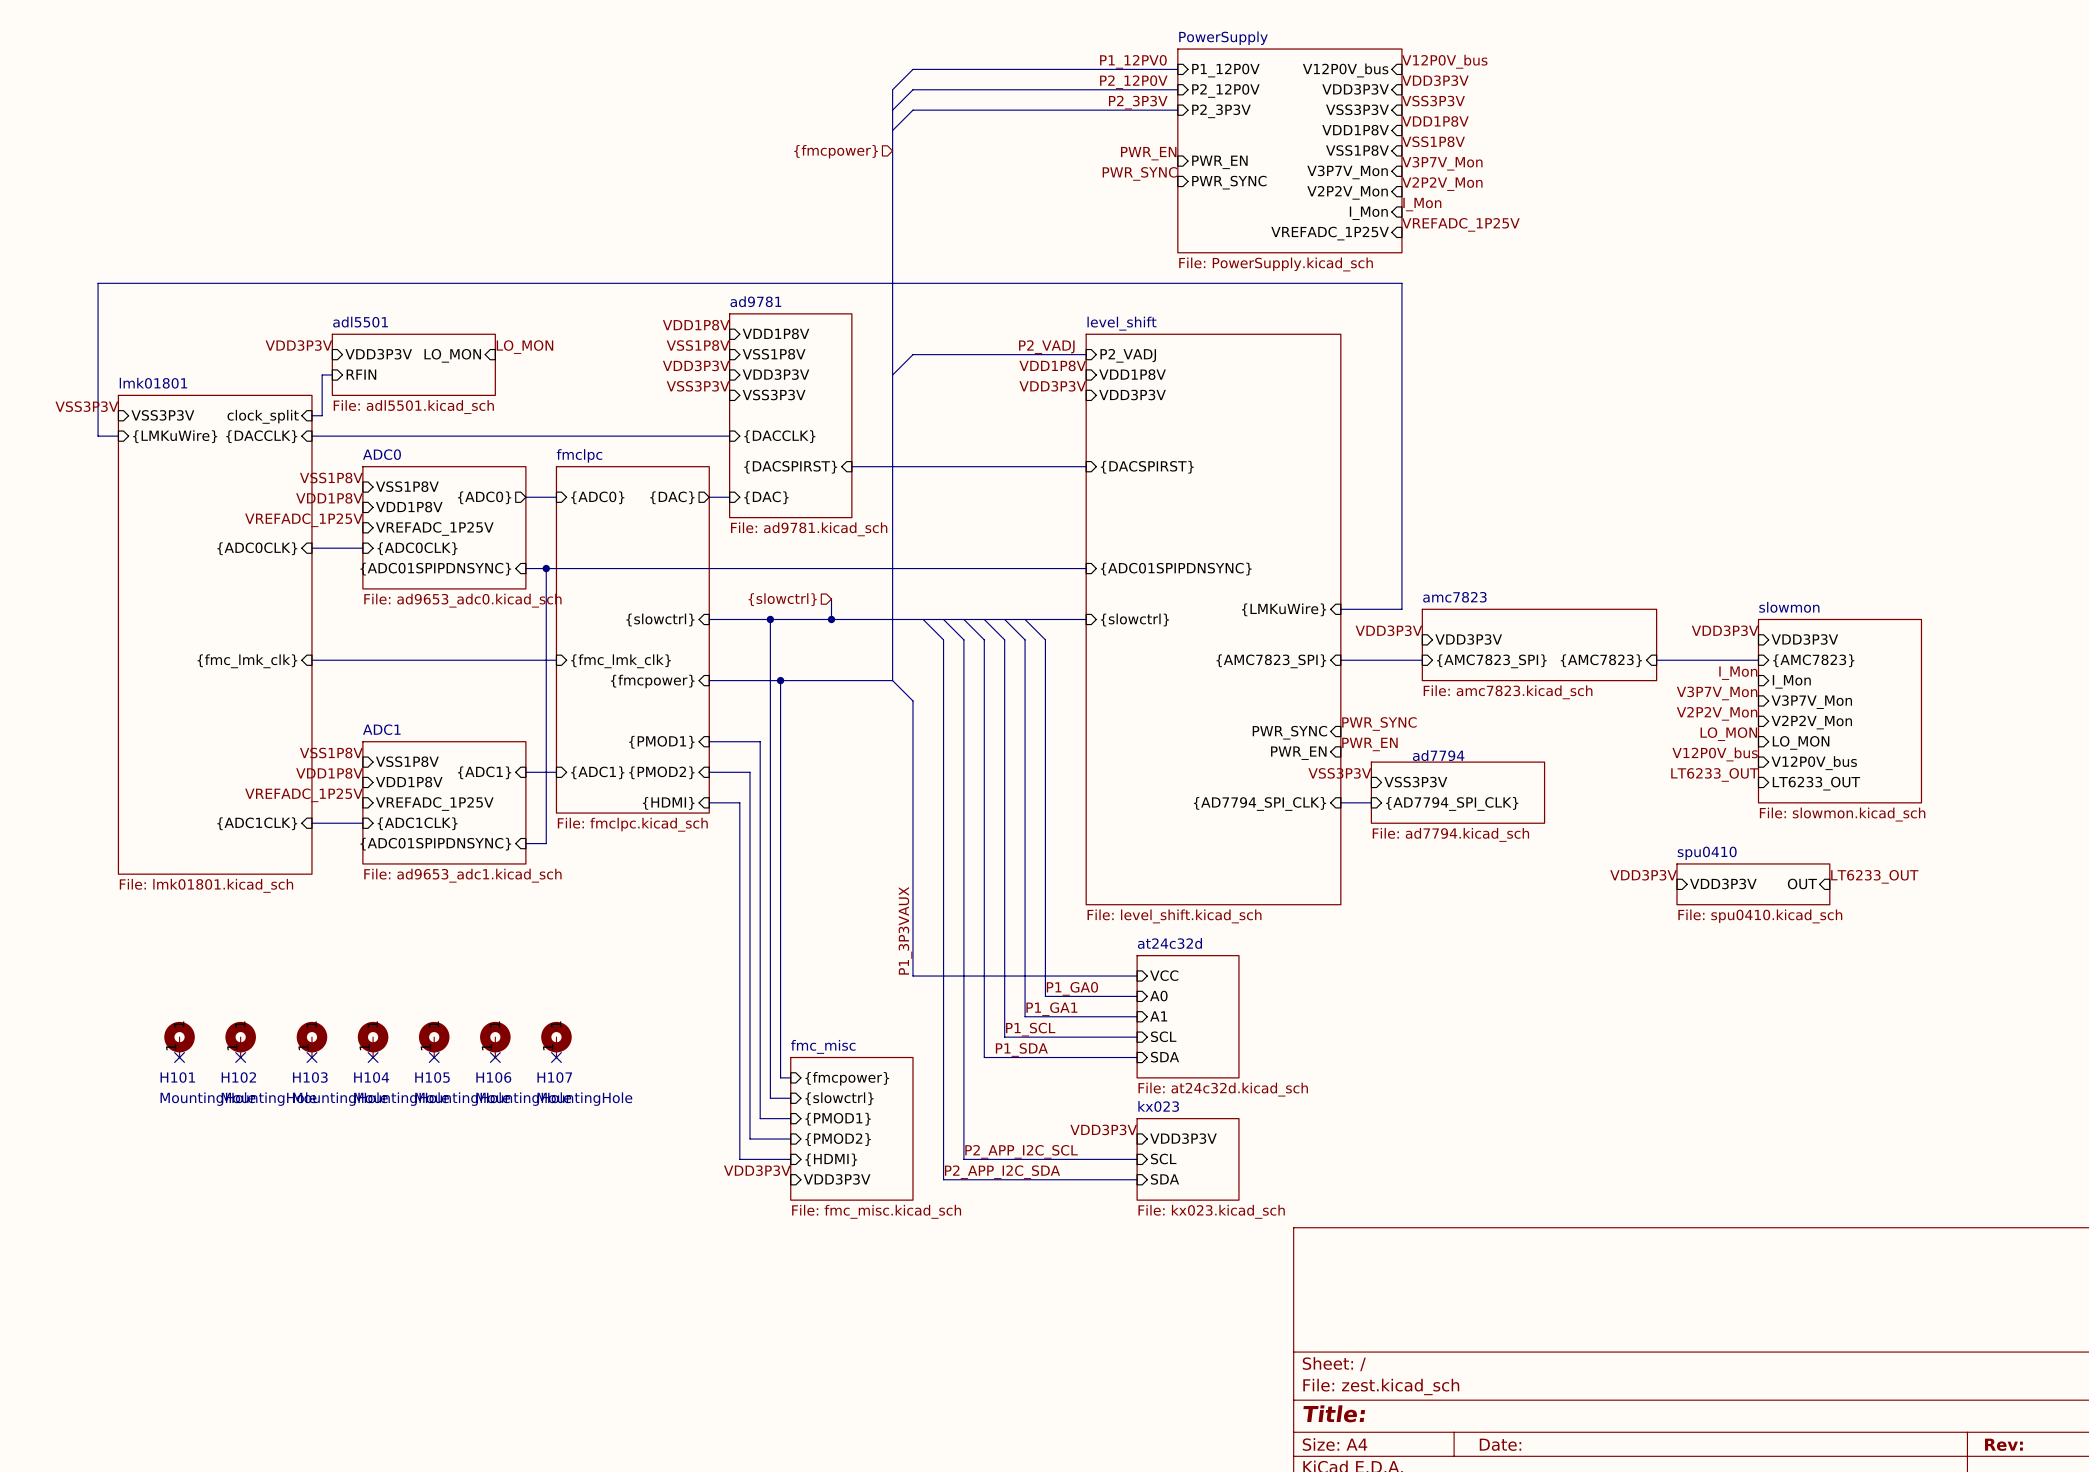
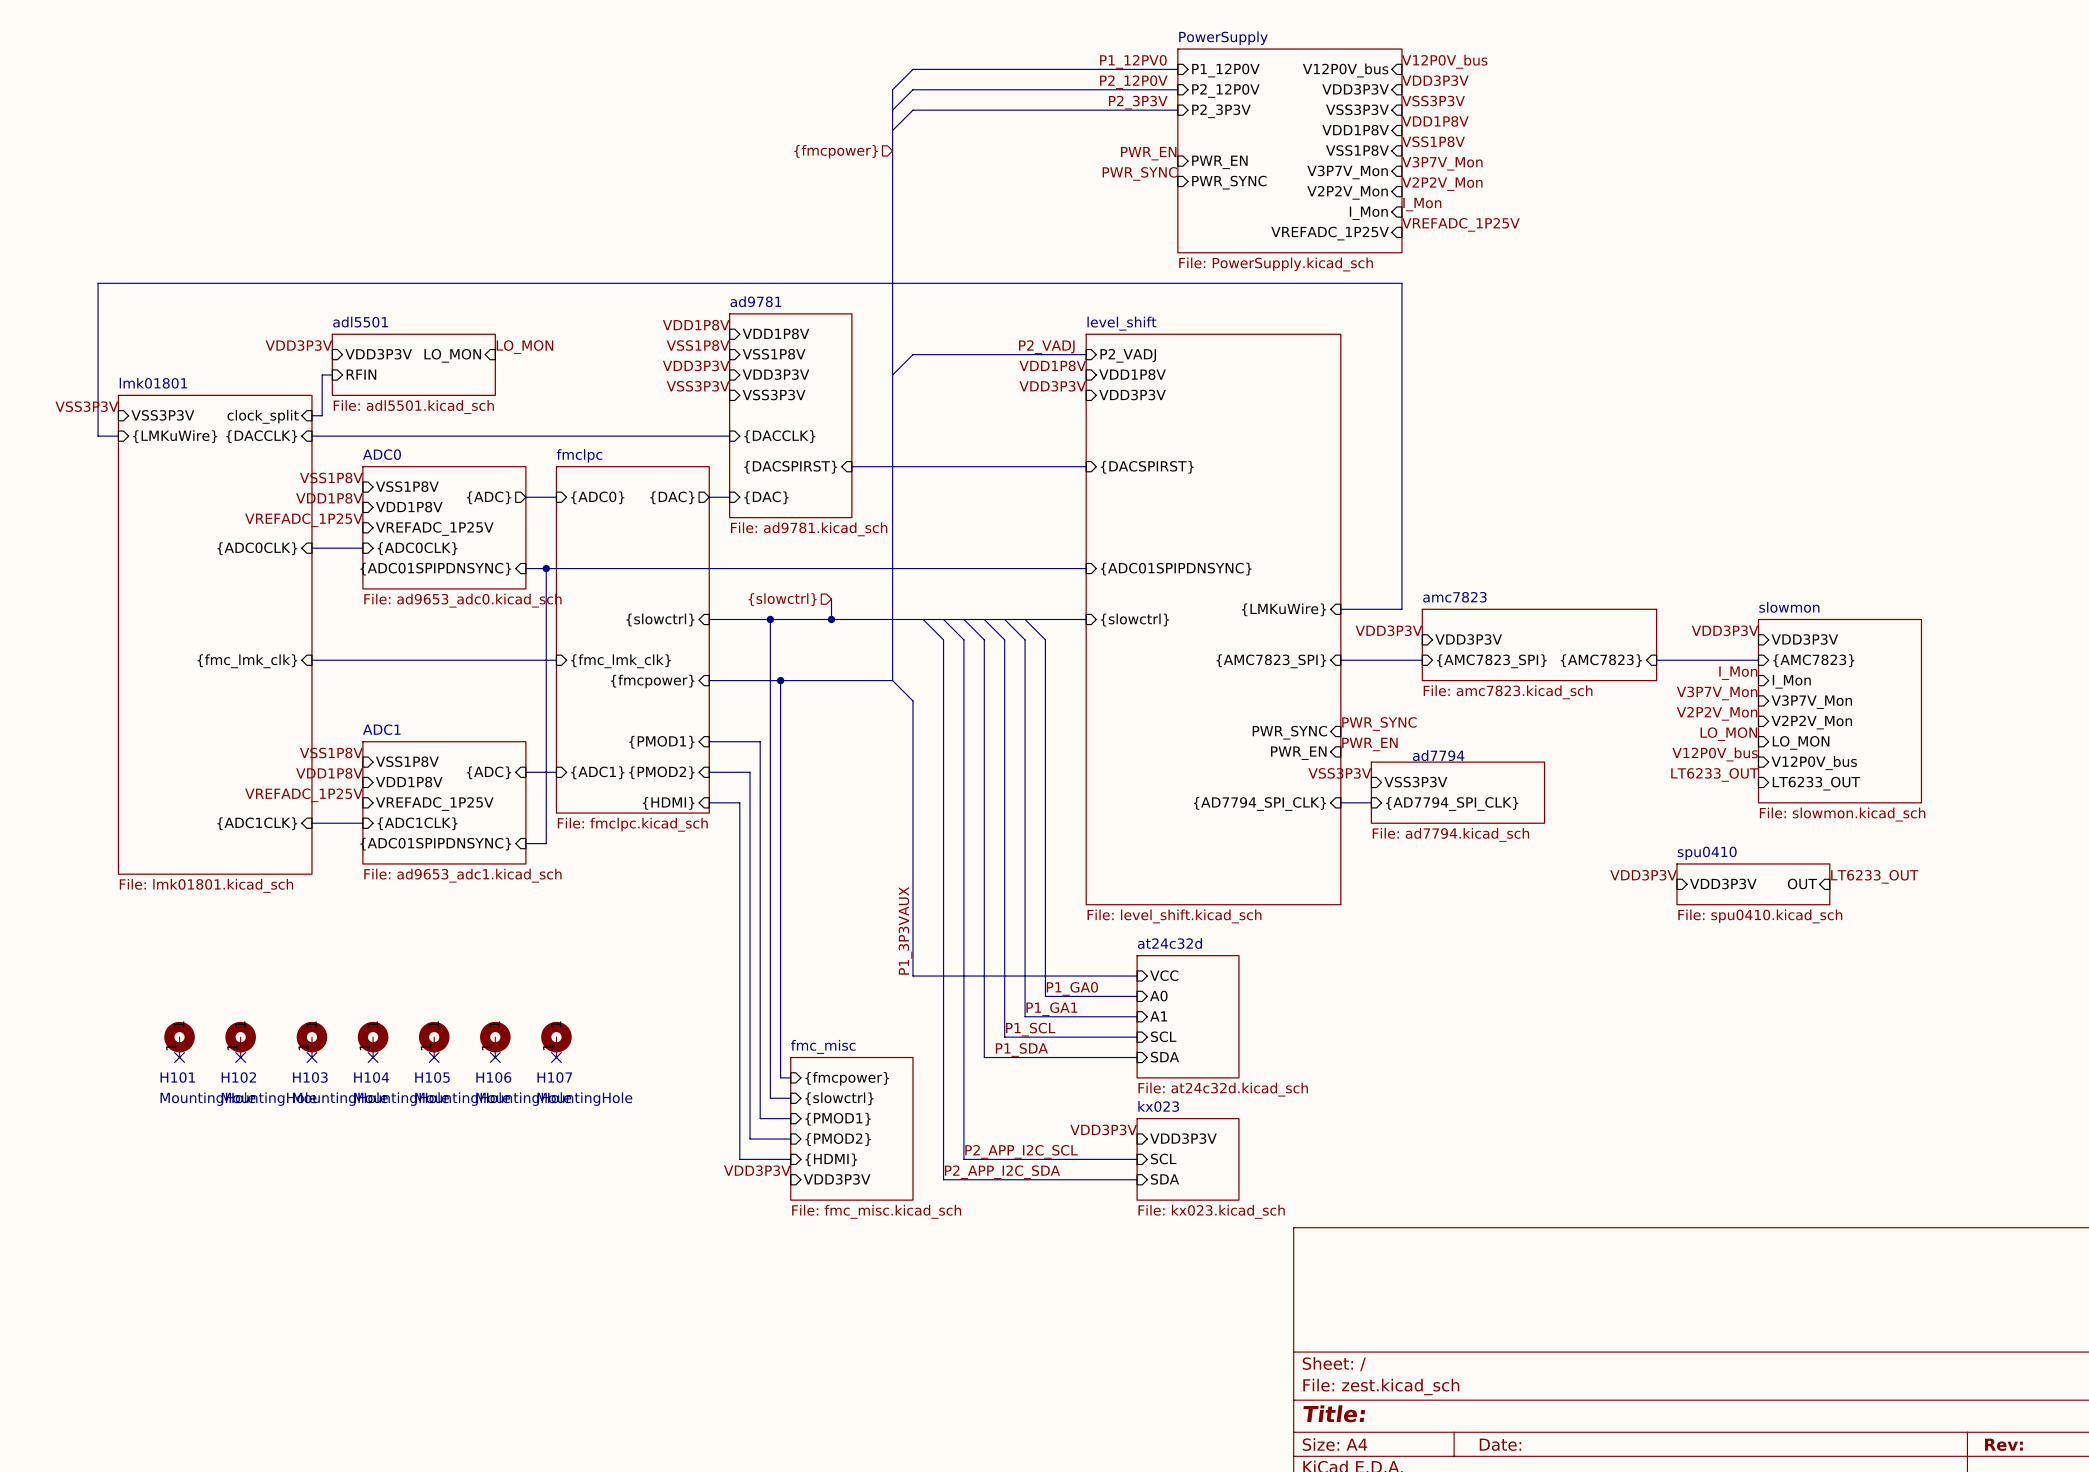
sheet pin: {ADC0} (484, 497) -> {ADC} (489, 497)
sheet pin: {ADC1} (484, 772) -> {ADC} (489, 772)

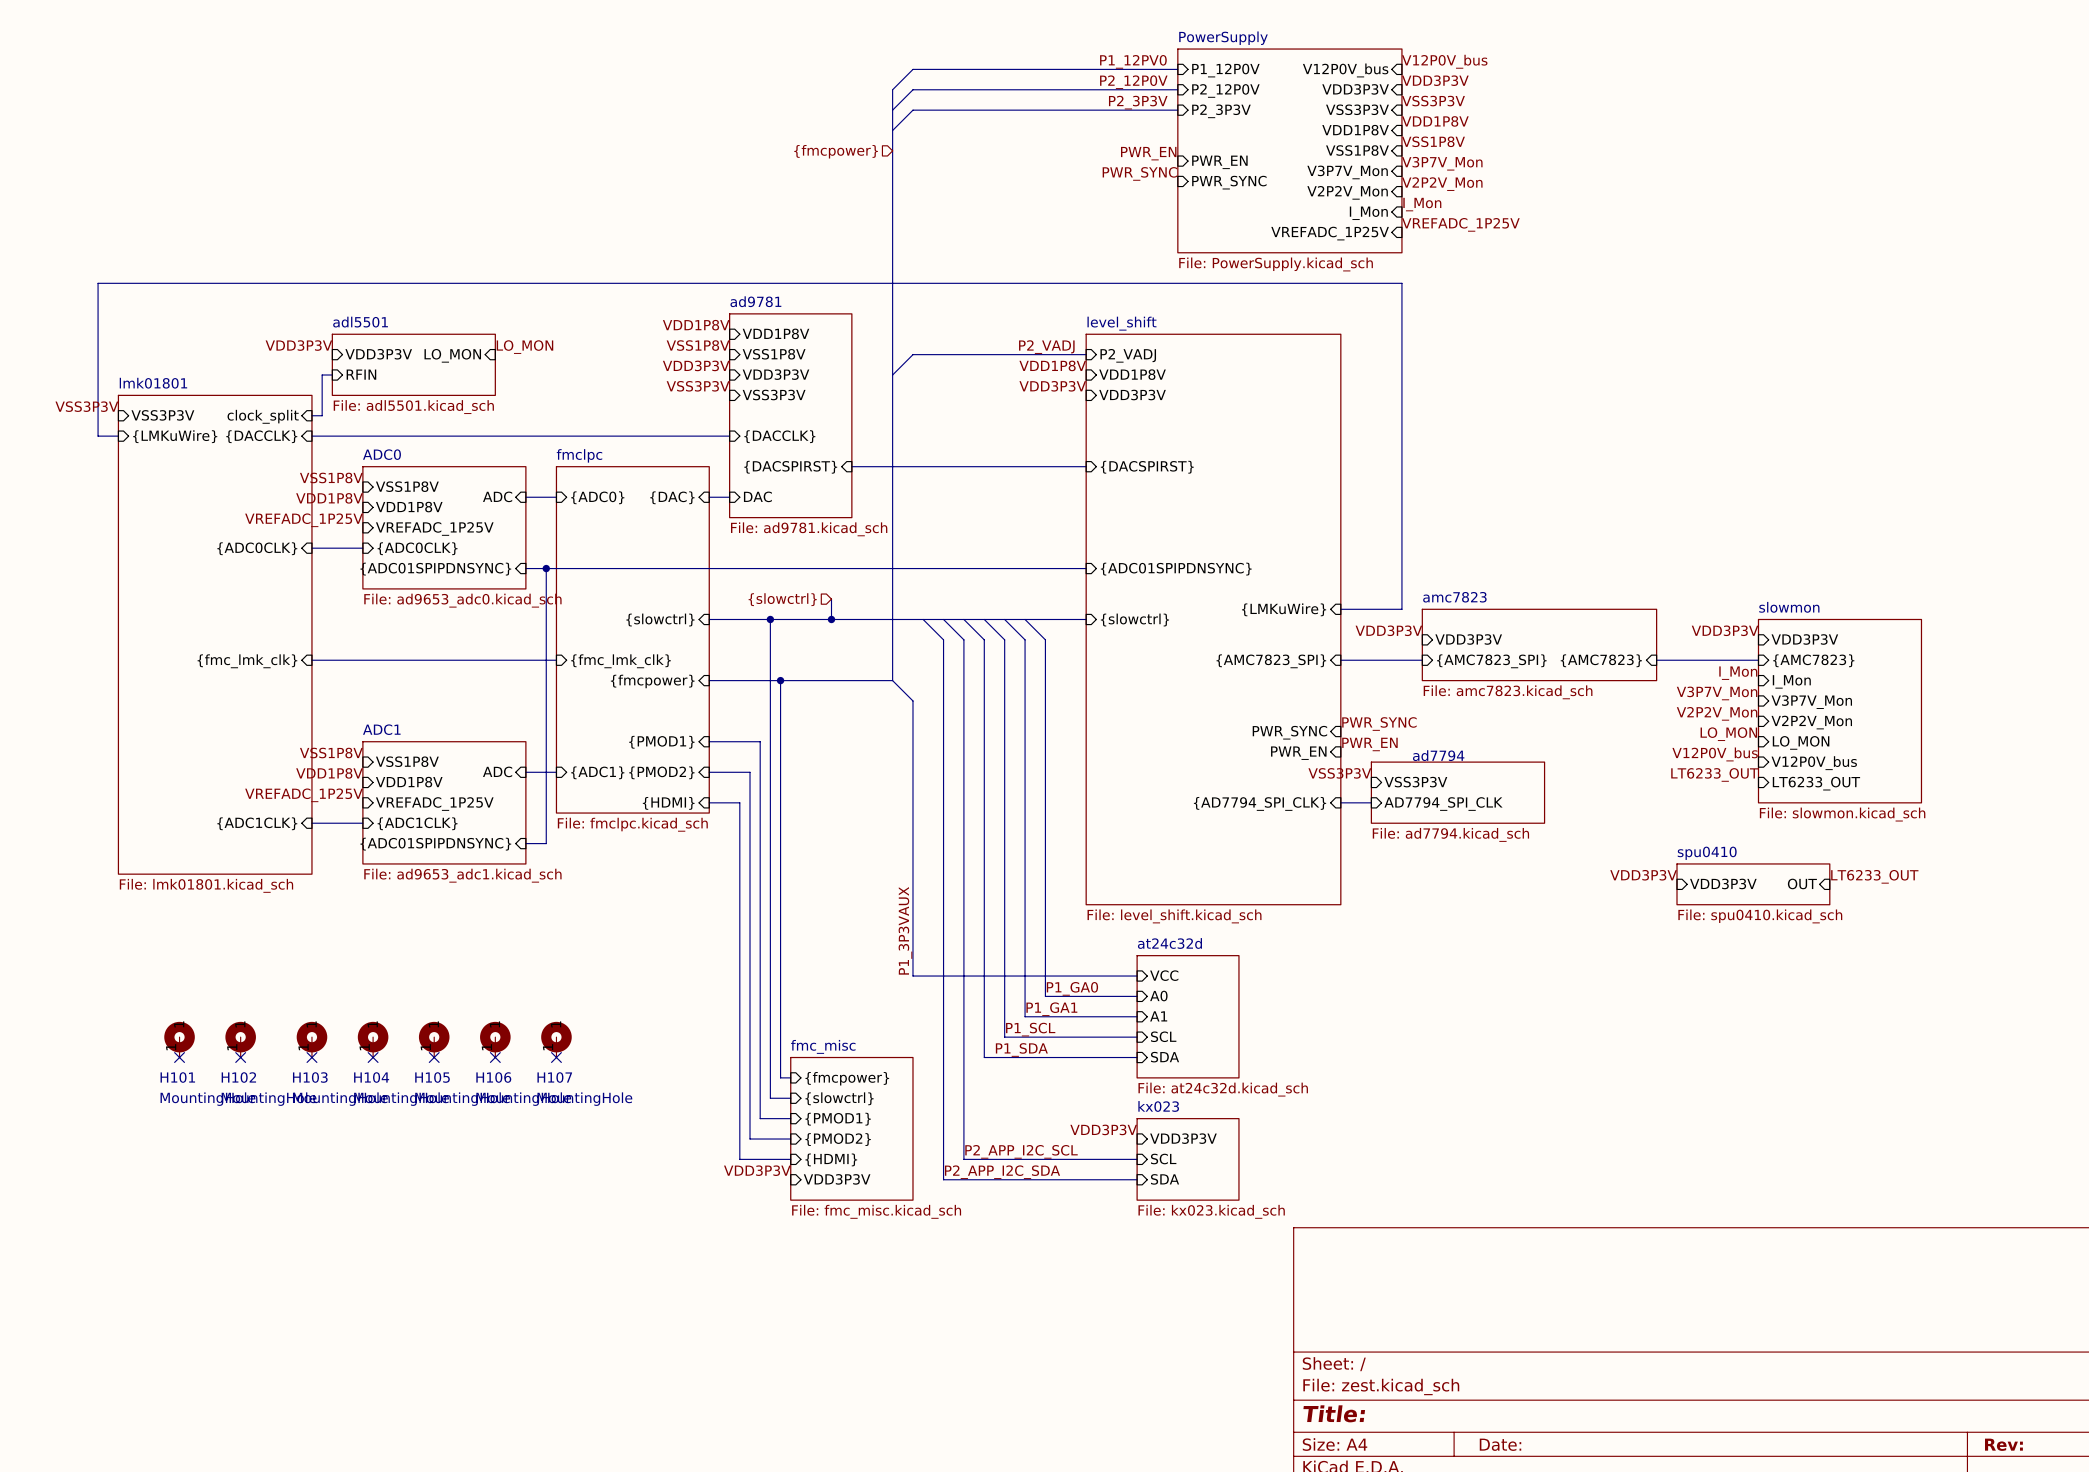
sheet pin shape: output (489, 497) -> input (497, 496)
sheet pin: {ADC} (489, 497) -> ADC (497, 496)
sheet pin shape: output (672, 497) -> input (672, 497)
sheet pin: {DAC} (766, 497) -> DAC (757, 496)
sheet pin: {ADC} (489, 772) -> ADC (497, 771)
sheet pin: {AD7794_SPI_CLK} (1452, 803) -> AD7794_SPI_CLK (1443, 804)

